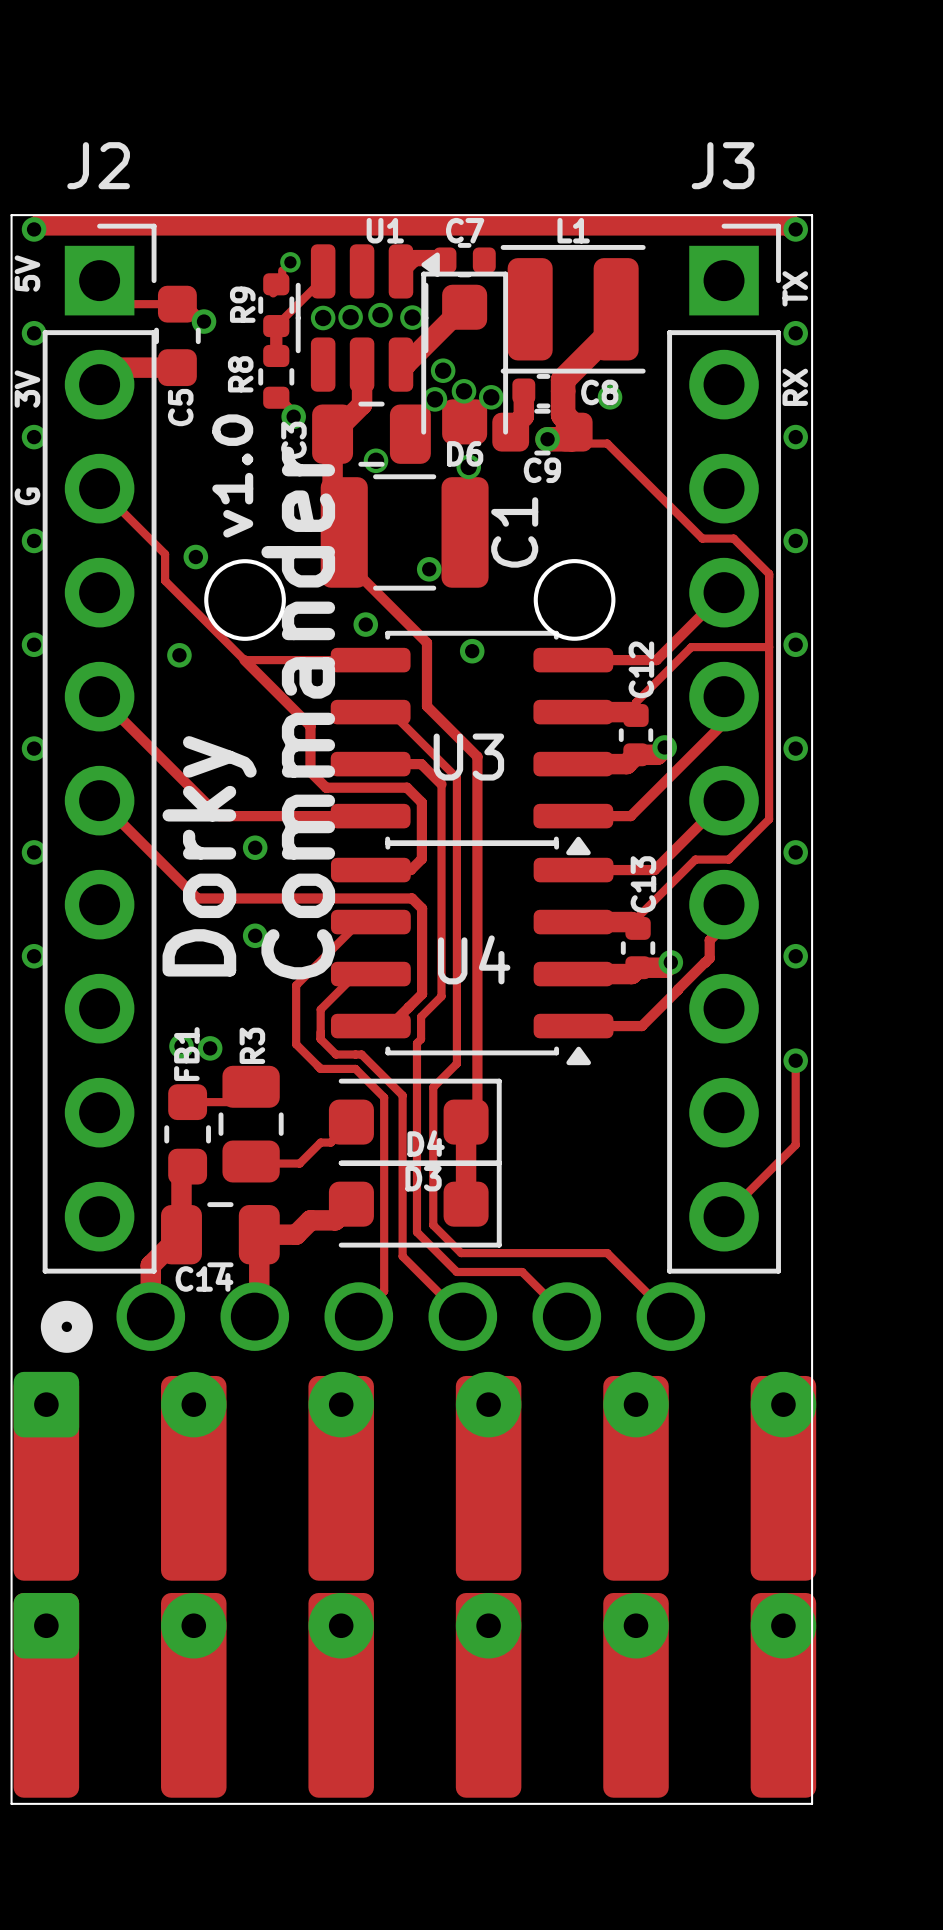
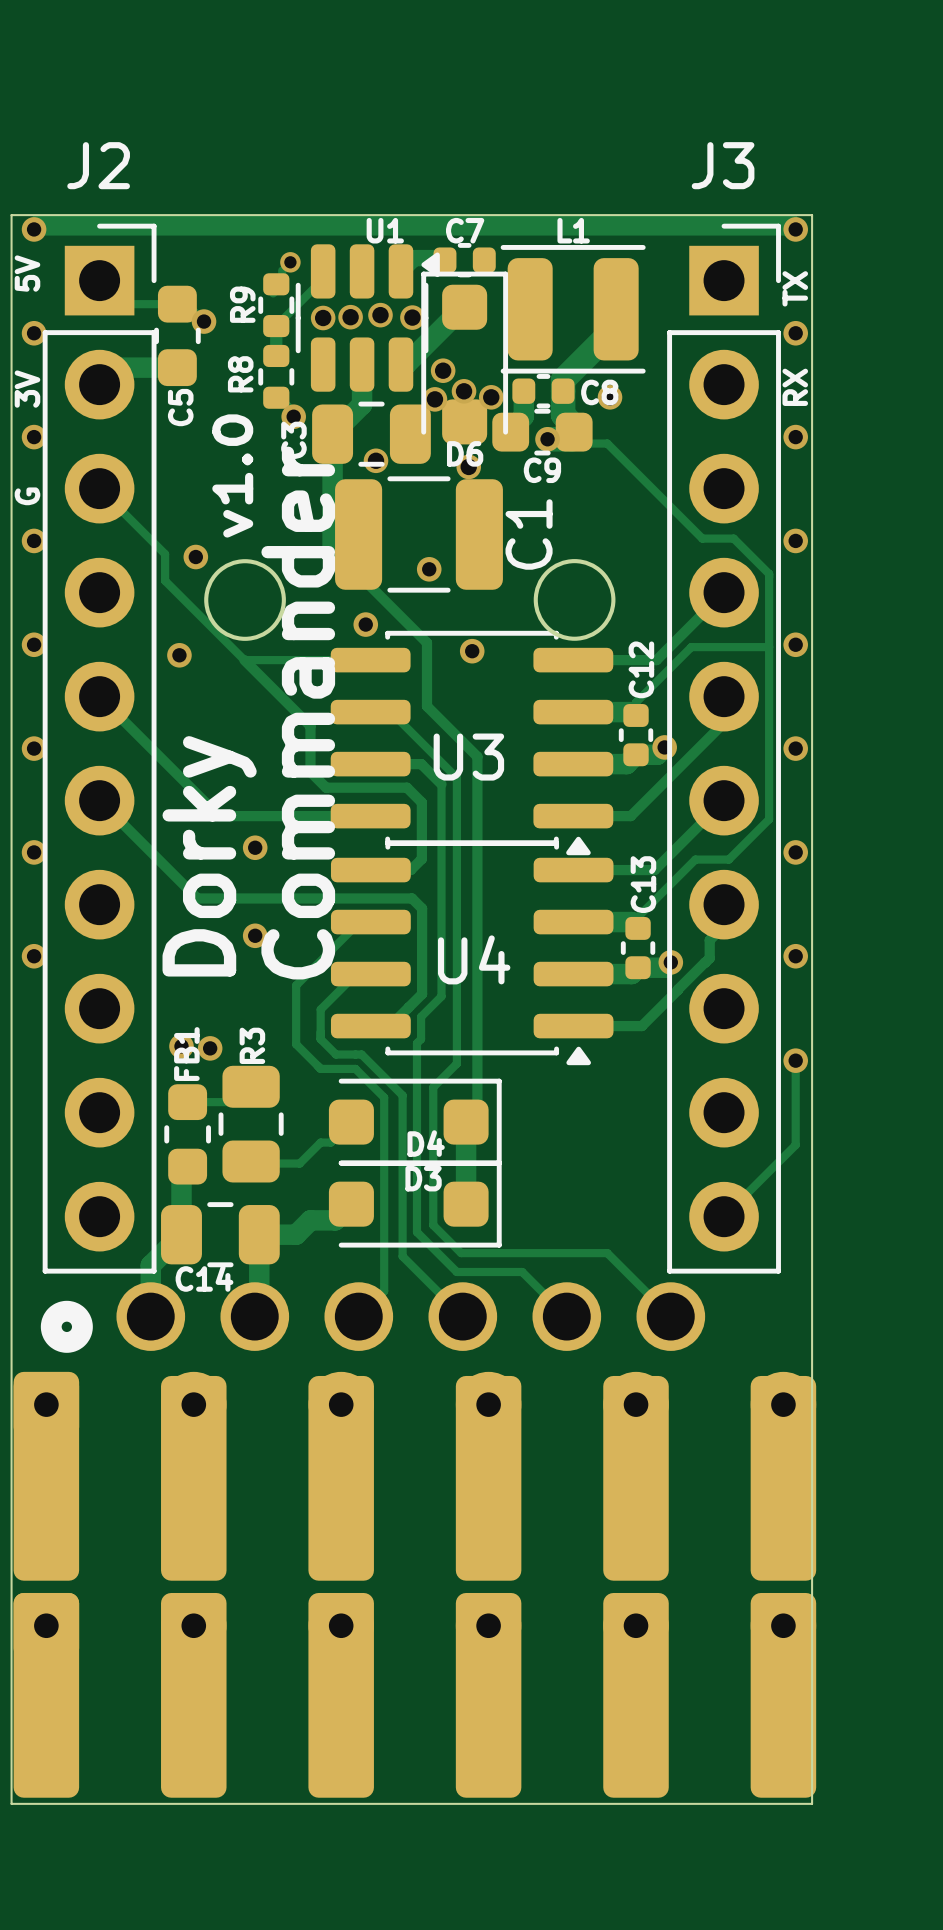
C1 position: (404, 532) -> (418, 534)

